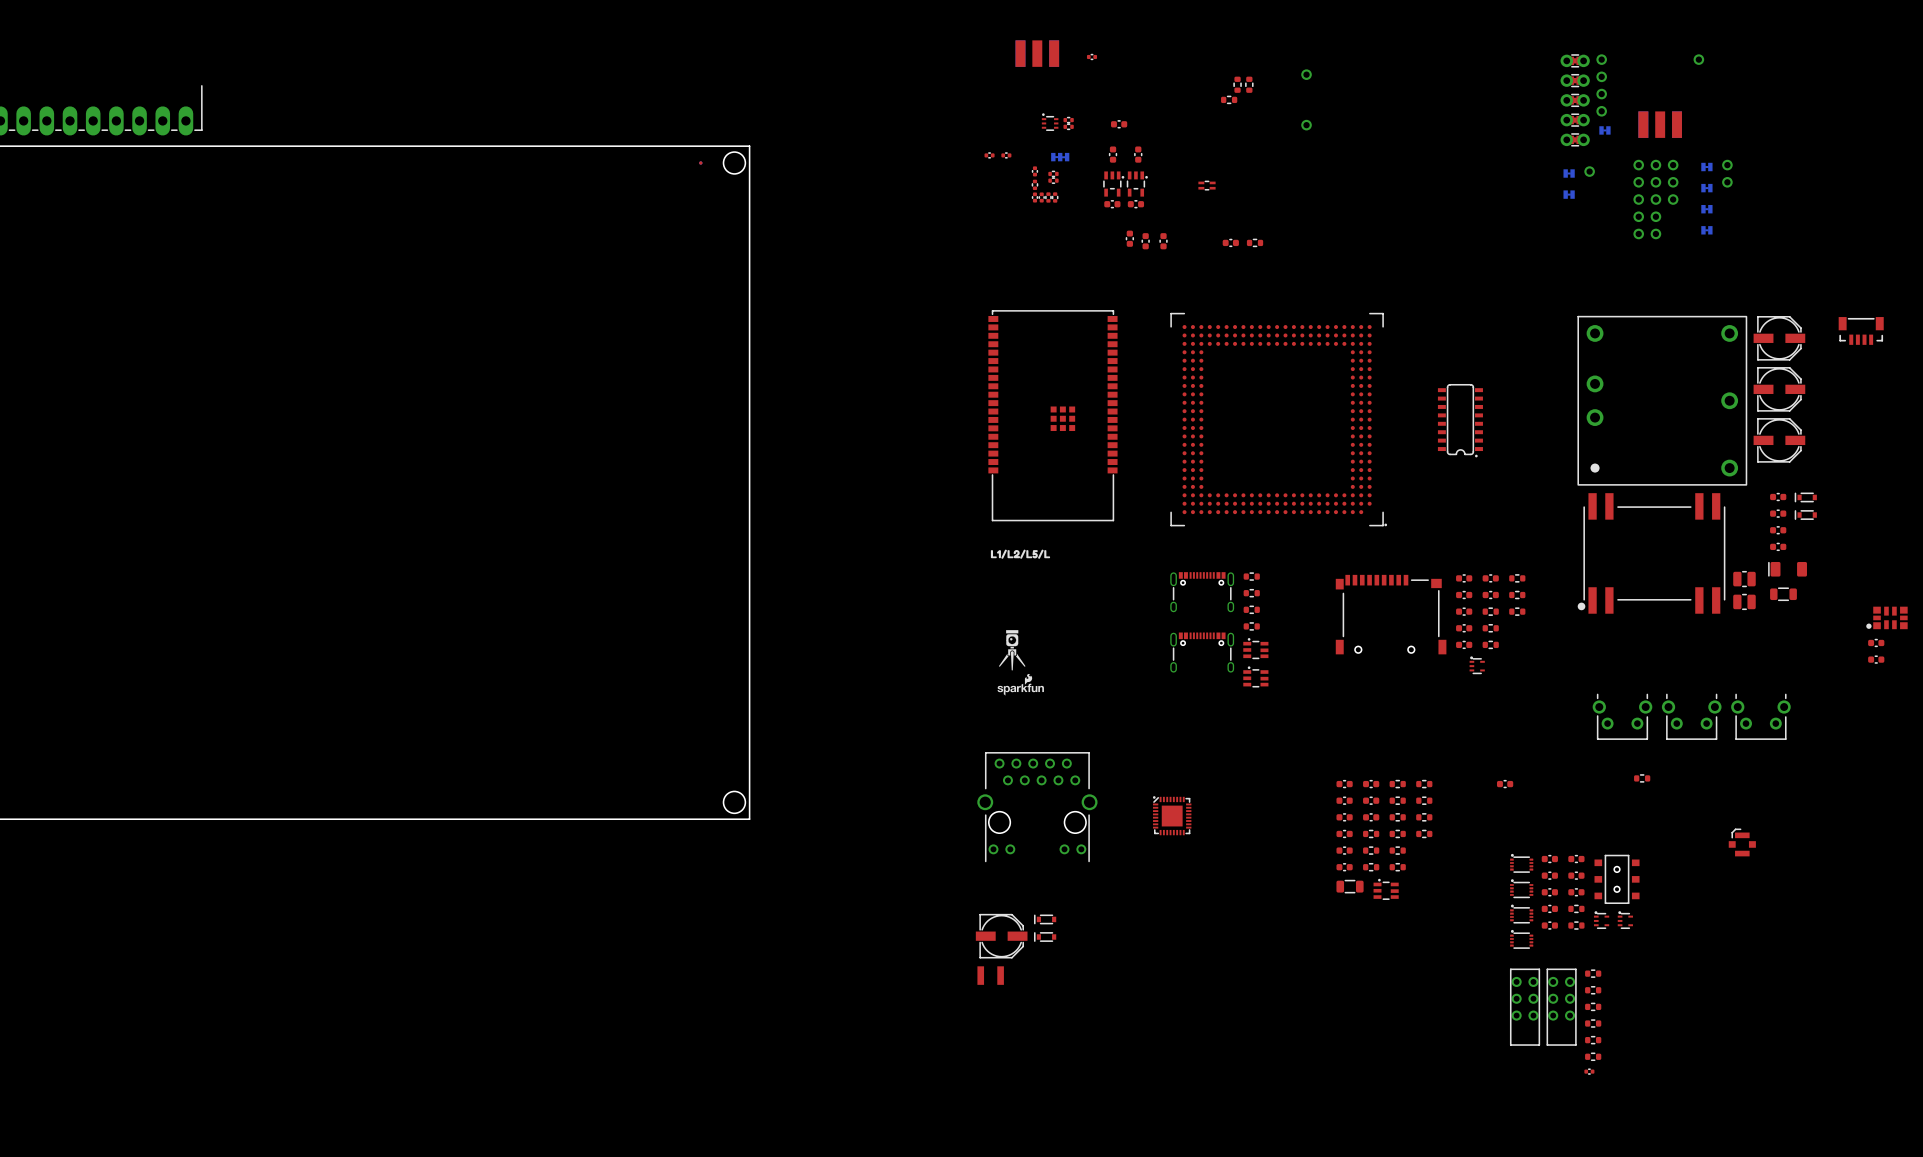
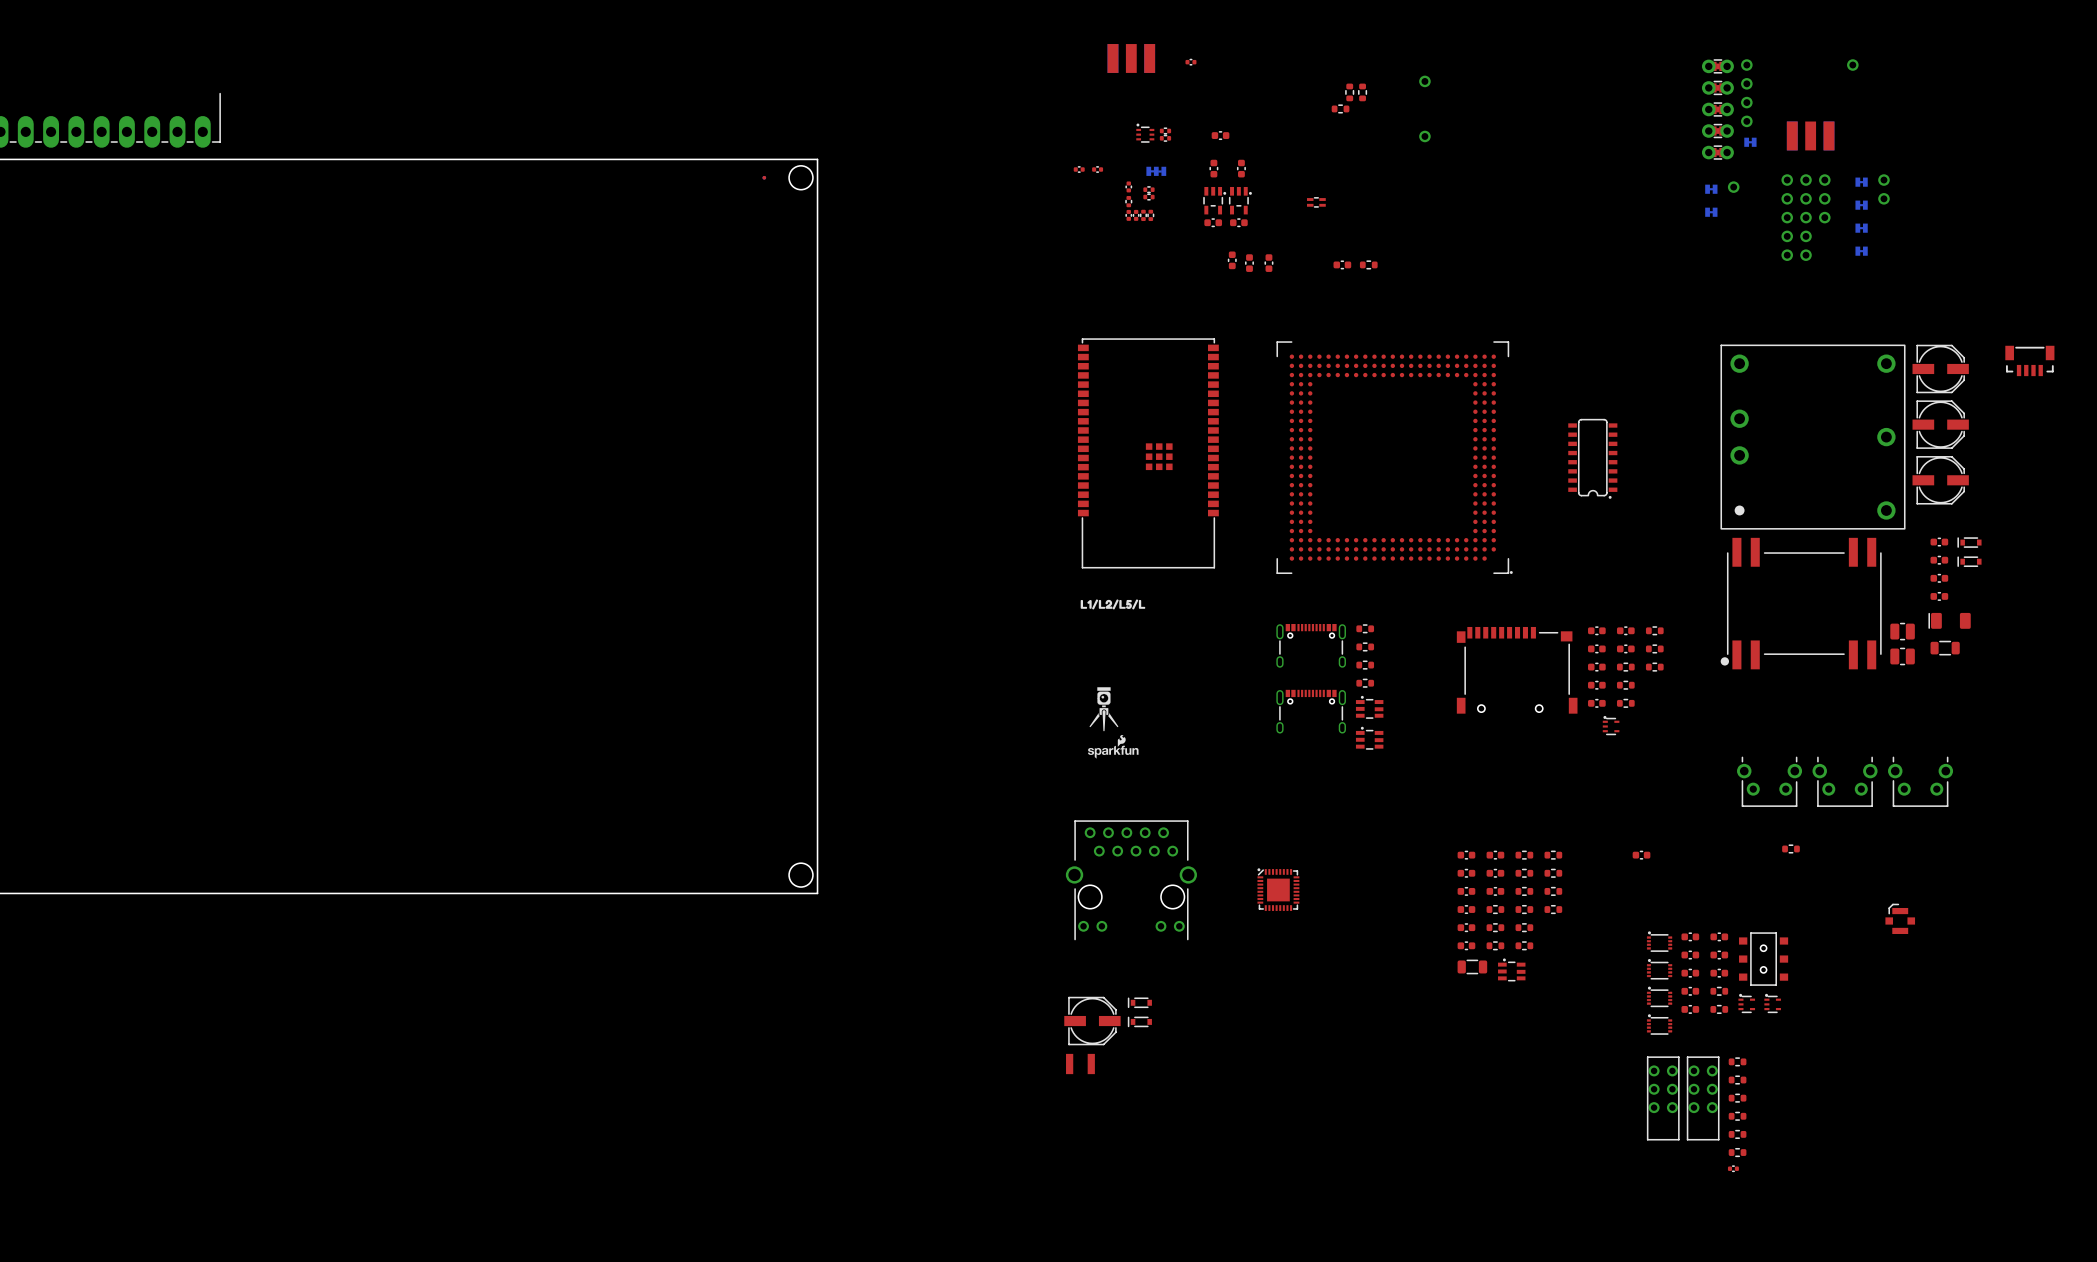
part: (1886, 617) -> none
part: (1876, 642) -> none
part: (1876, 659) -> none

